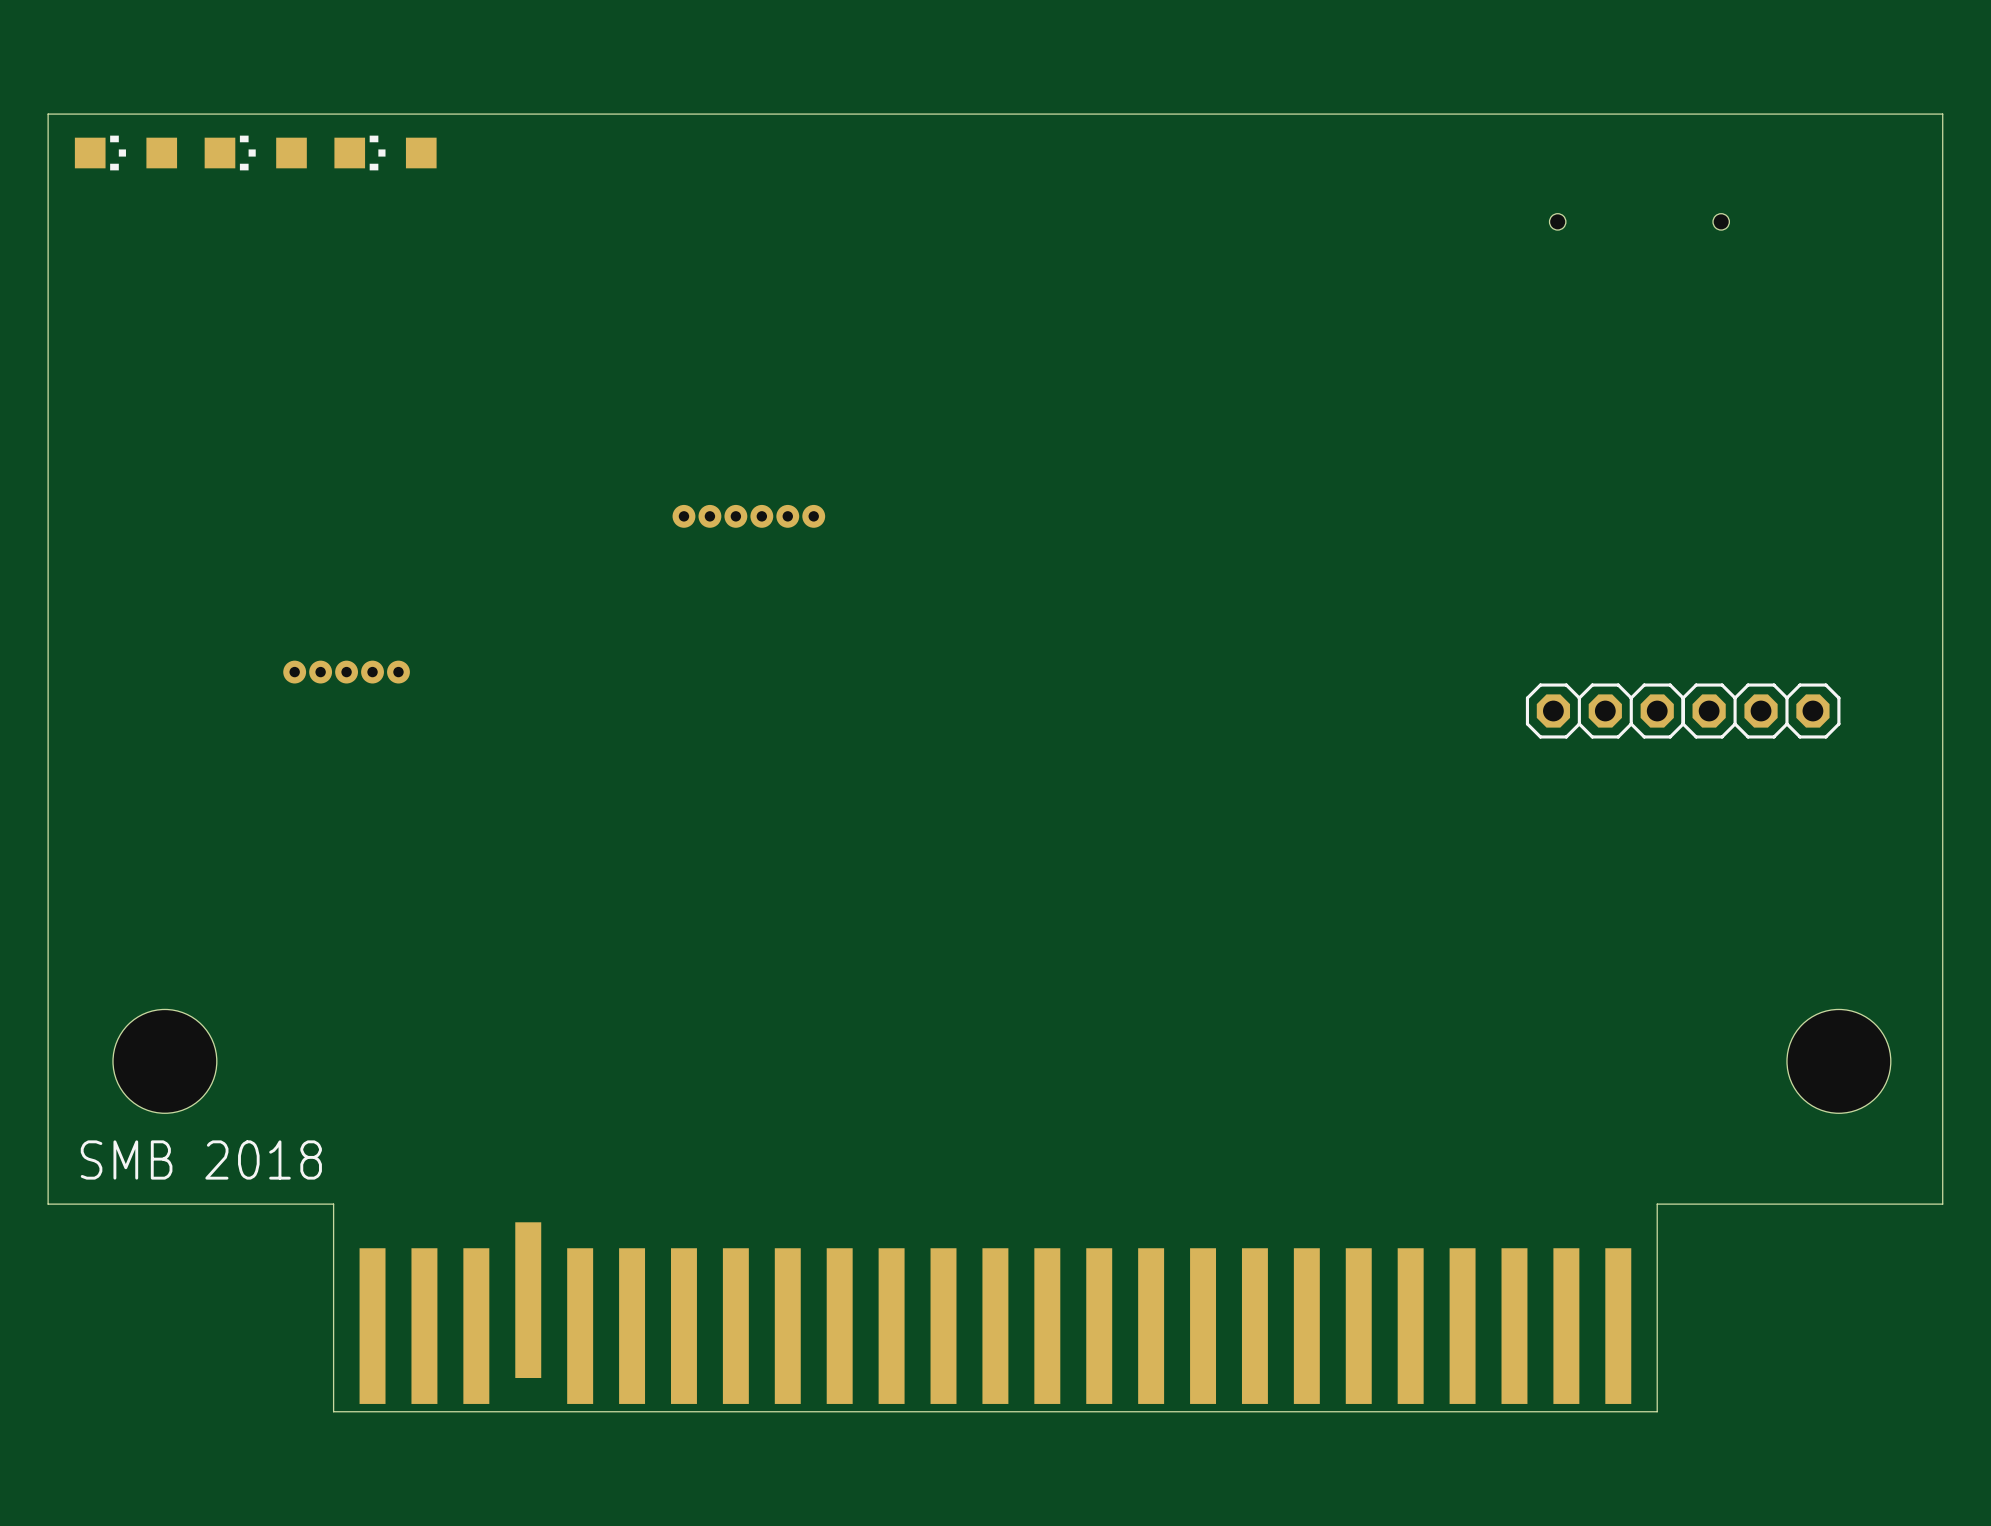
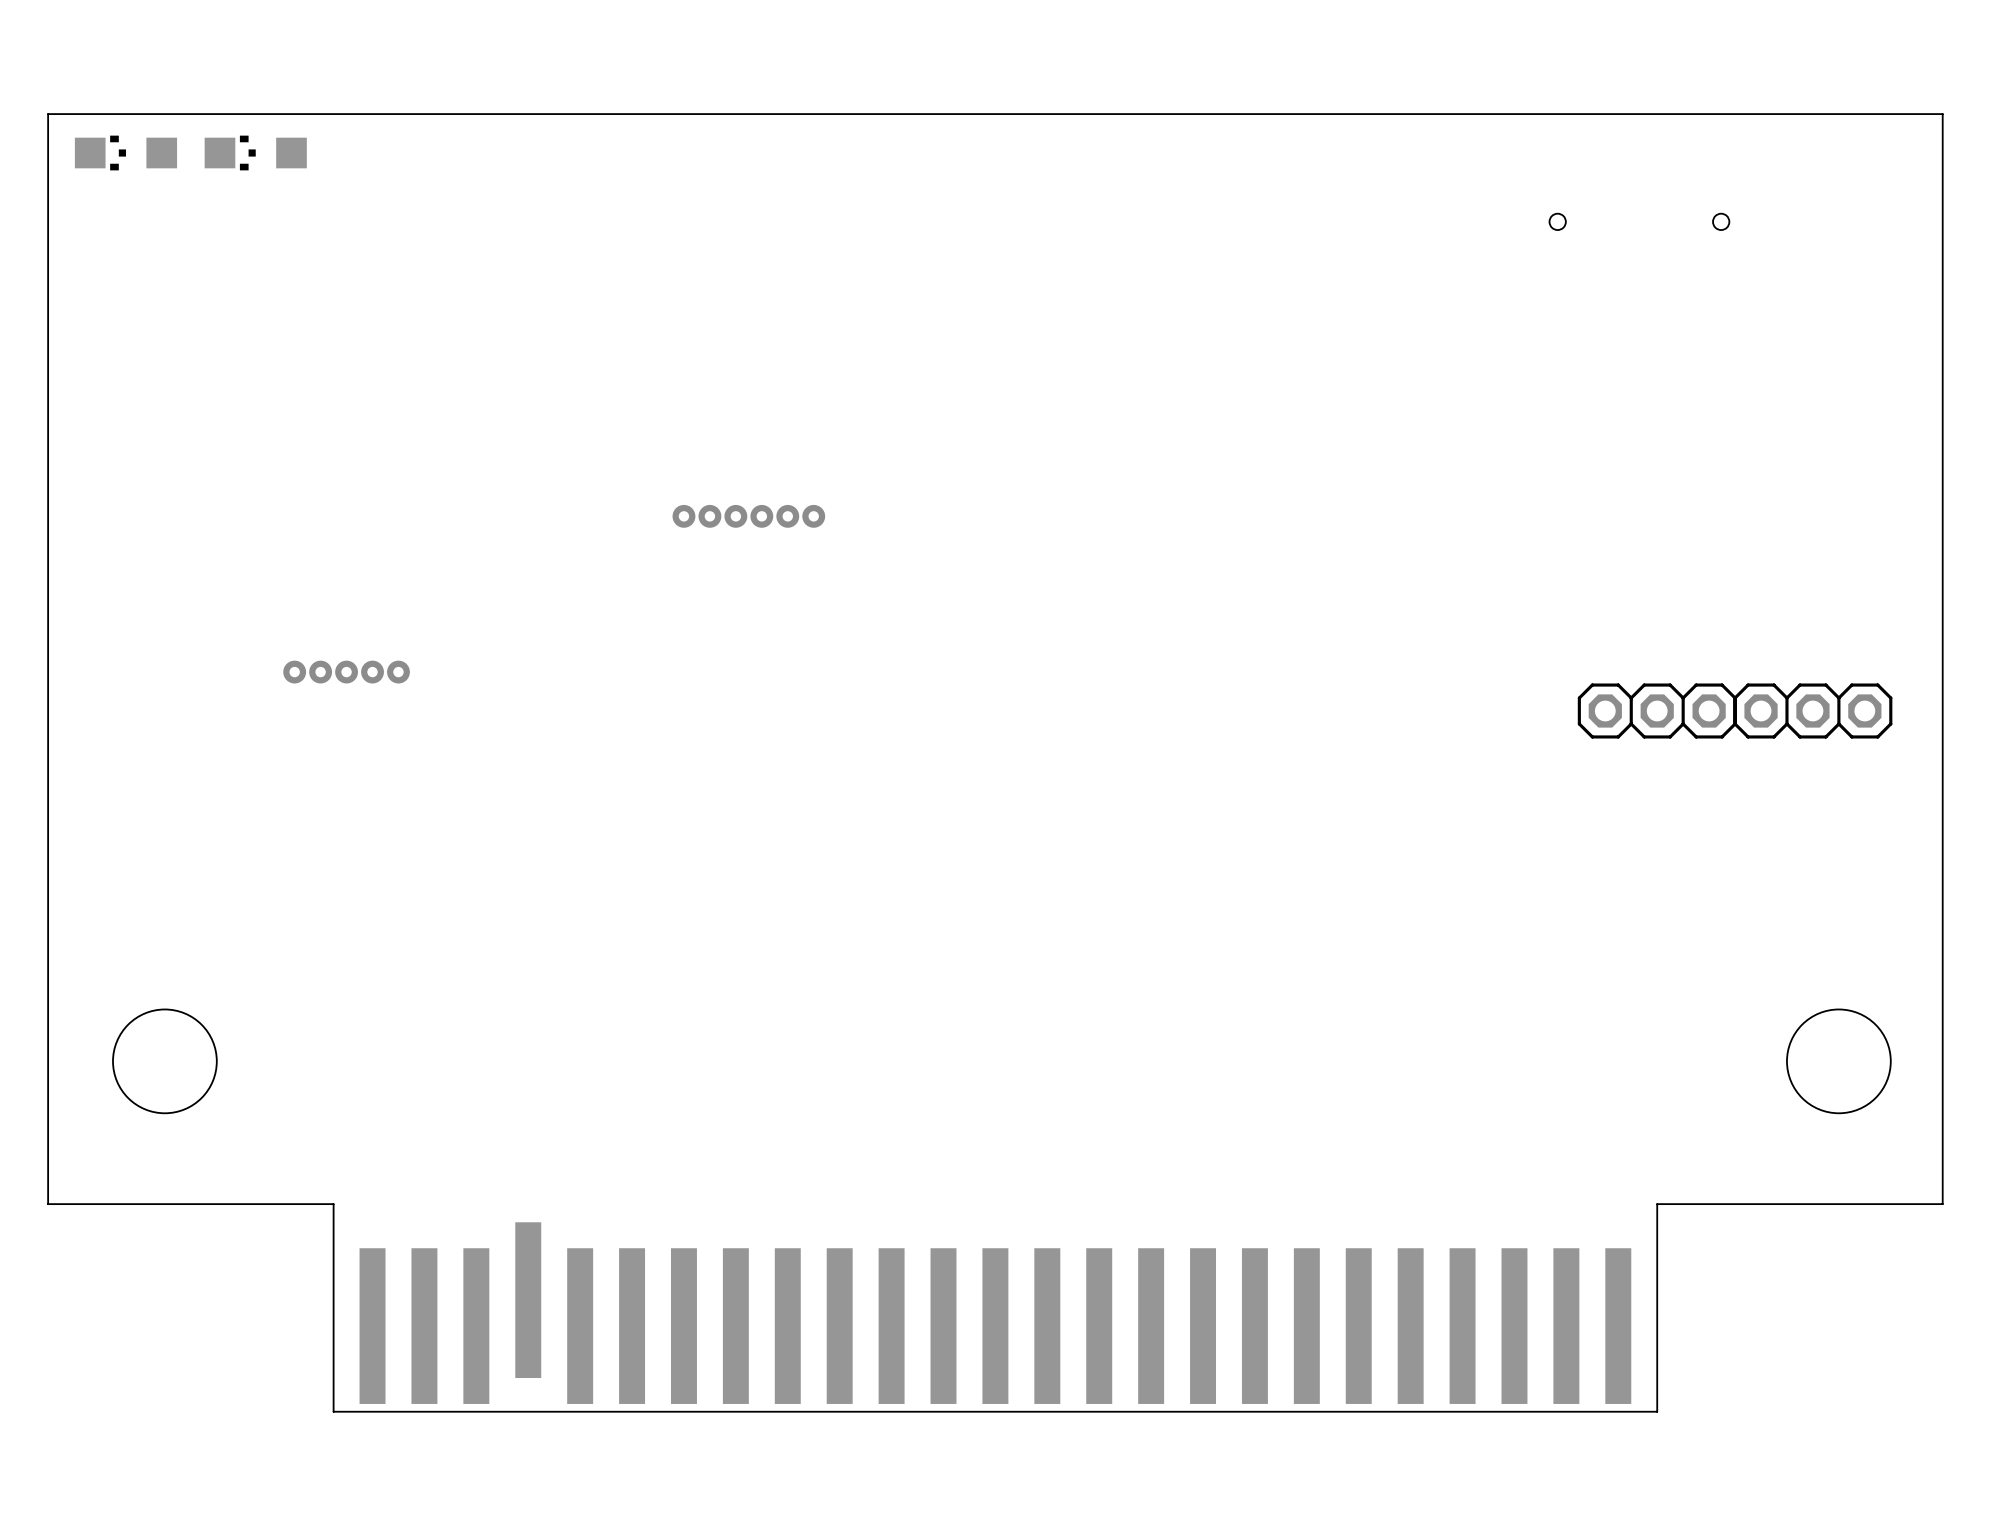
part: (385, 153) -> none
part: (1605, 711) -> none
part: none -> (1657, 711)
part: (1761, 711) -> none
part: none -> (1812, 711)
text: SMB 2018 (201, 1159) -> none

